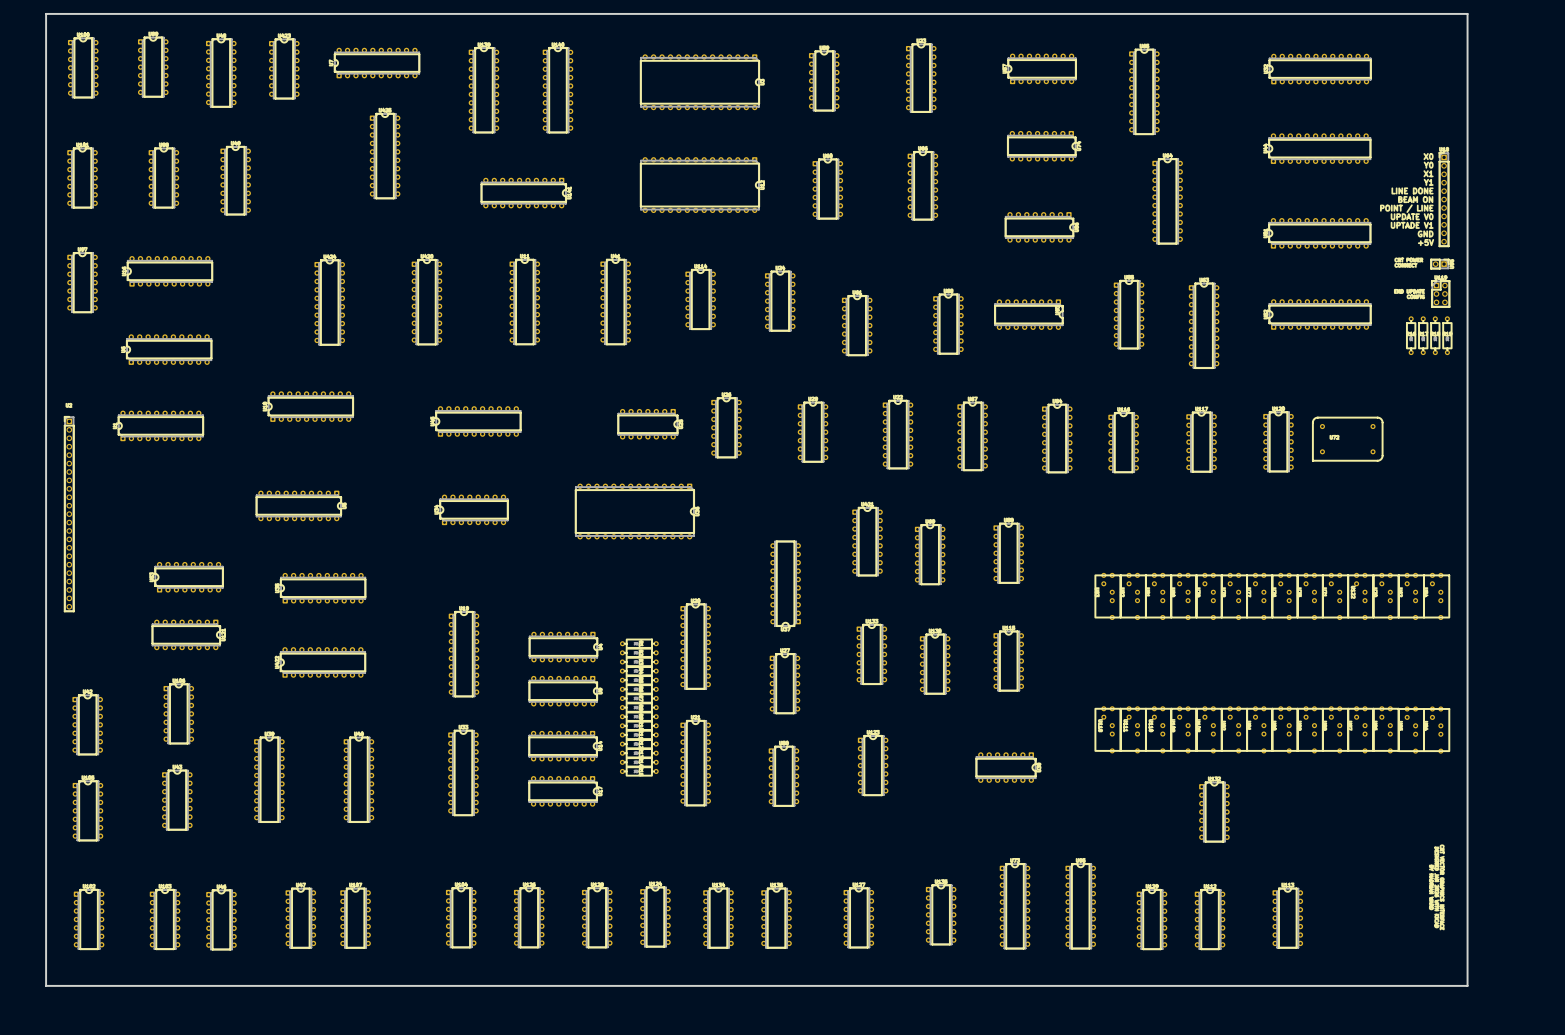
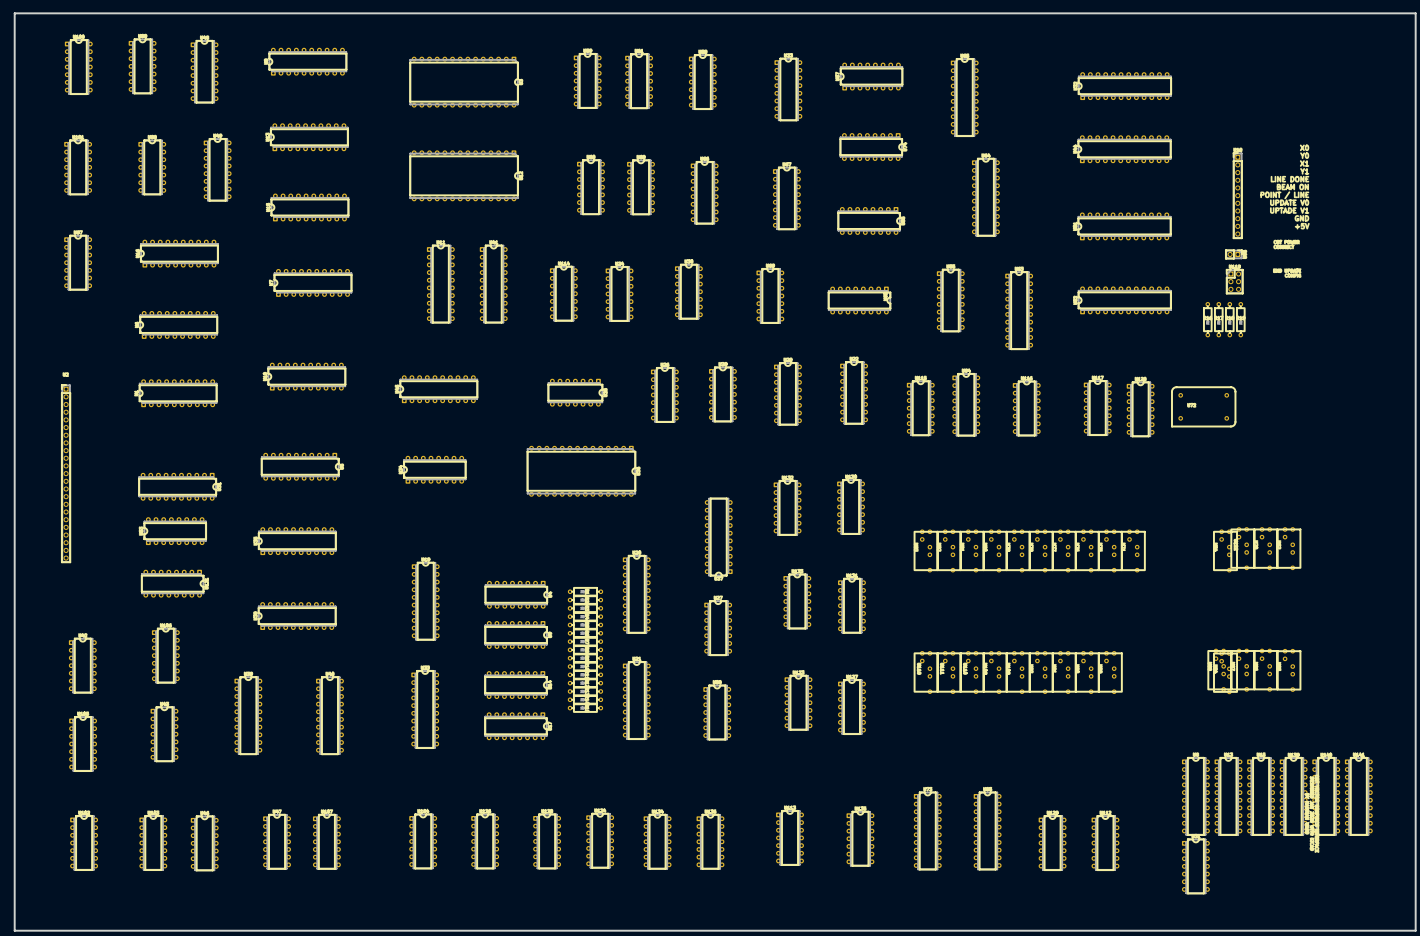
board edge: (46, 13) (1467, 13) (1467, 985) (46, 985) (46, 13) -> (14, 13) (14, 930) (1415, 930) (1415, 13) (14, 13)
part: none -> (307, 61)
part position: (377, 63) -> (312, 282)
part: (284, 68) -> none
part position: (1042, 68) -> (871, 76)
part position: (1320, 69) -> (1124, 86)
part position: (921, 78) -> (788, 89)
part position: (824, 80) -> (587, 80)
part position: (699, 82) -> (464, 82)
part position: (483, 90) -> (1293, 796)
part position: (557, 90) -> (1326, 796)
part position: (1144, 91) -> (964, 97)
part: none -> (309, 137)
part position: (1041, 146) -> (871, 147)
part position: (1319, 148) -> (1124, 149)
part: (385, 156) -> none
part position: (699, 185) -> (464, 175)
part position: (922, 185) -> (704, 192)
part position: (827, 189) -> (590, 187)
part rotation: 0° (523, 193) -> 90° counterclockwise (1358, 796)
part position: (523, 193) -> (1358, 796)
part position: (1444, 199) -> (1237, 195)
part position: (1167, 201) -> (985, 197)
part: none -> (309, 207)
part position: (1039, 227) -> (869, 220)
part position: (1319, 233) -> (1124, 226)
part position: (1439, 264) -> (1233, 254)
part position: (169, 271) -> (179, 253)
part position: (1440, 293) -> (1234, 281)
part position: (700, 299) -> (563, 293)
part position: (780, 301) -> (619, 293)
part: (329, 302) -> none
part: (426, 302) -> none
part position: (524, 302) -> (440, 284)
part position: (615, 302) -> (493, 284)
part position: (1028, 314) -> (859, 300)
part position: (1129, 314) -> (950, 300)
part position: (1320, 314) -> (1124, 300)
part position: (948, 324) -> (641, 187)
part position: (857, 325) -> (639, 81)
part position: (1204, 325) -> (1019, 310)
part position: (1411, 335) -> (1207, 319)
part position: (1423, 335) -> (1218, 319)
part position: (1435, 335) -> (1229, 319)
part position: (1447, 335) -> (1240, 319)
part position: (169, 349) -> (178, 324)
part position: (310, 406) -> (306, 376)
part position: (647, 424) -> (575, 392)
part position: (160, 425) -> (178, 393)
part: none -> (787, 393)
part position: (813, 432) -> (722, 394)
part position: (898, 434) -> (854, 392)
part position: (972, 436) -> (786, 198)
part position: (1347, 439) -> (1203, 406)
part position: (1278, 441) -> (1140, 409)
part position: (298, 505) -> (300, 466)
part: none -> (177, 486)
part: (867, 541) -> none
part position: (1008, 553) -> (702, 82)
part position: (930, 554) -> (770, 295)
part position: (1108, 596) -> (926, 550)
part position: (1133, 596) -> (949, 550)
part position: (1158, 596) -> (972, 550)
part position: (1183, 596) -> (995, 550)
part position: (1209, 596) -> (1018, 550)
part position: (1234, 596) -> (1041, 550)
part position: (1259, 596) -> (1064, 550)
part position: (1284, 596) -> (1087, 550)
part position: (1310, 596) -> (1110, 550)
part position: (1335, 596) -> (1133, 550)
part position: (1436, 596) -> (1225, 550)
part: none -> (851, 605)
part position: (1008, 661) -> (920, 408)
part: (322, 662) -> none
part position: (935, 664) -> (851, 506)
part: none -> (297, 616)
part position: (1108, 729) -> (926, 672)
part position: (1133, 729) -> (949, 672)
part position: (1158, 729) -> (972, 672)
part position: (1183, 729) -> (995, 672)
part position: (1209, 729) -> (1018, 672)
part position: (1234, 729) -> (1041, 672)
part position: (1259, 729) -> (1064, 672)
part position: (1284, 729) -> (1087, 672)
part position: (1310, 729) -> (1110, 672)
part position: (1436, 730) -> (1225, 672)
part rotation: 0° (1006, 767) -> 90° counterclockwise (688, 291)
part position: (1006, 767) -> (688, 291)
part position: (1214, 812) -> (787, 507)
part: none -> (1195, 796)
part: none -> (1228, 796)
part: none -> (1261, 796)
part position: (858, 917) -> (851, 707)
part position: (1287, 918) -> (790, 837)
part: none -> (1195, 866)

